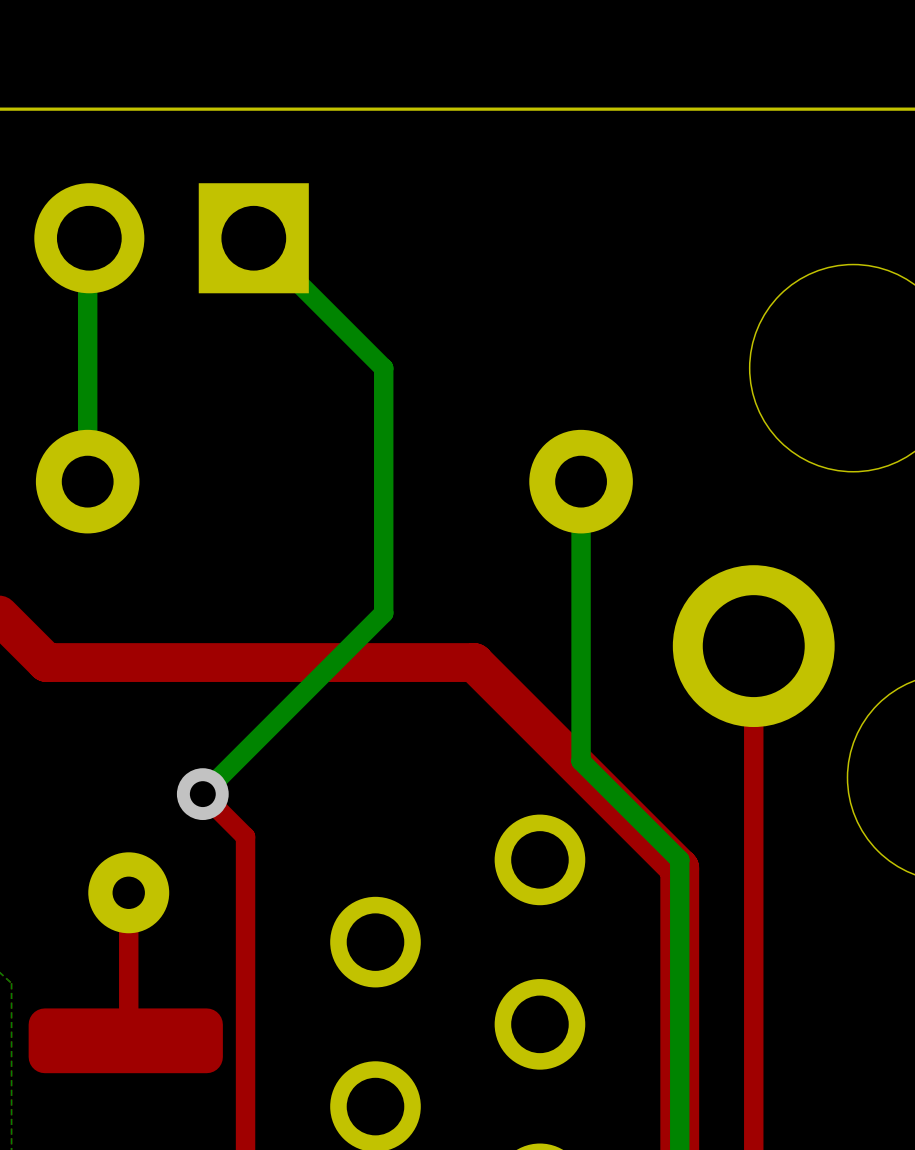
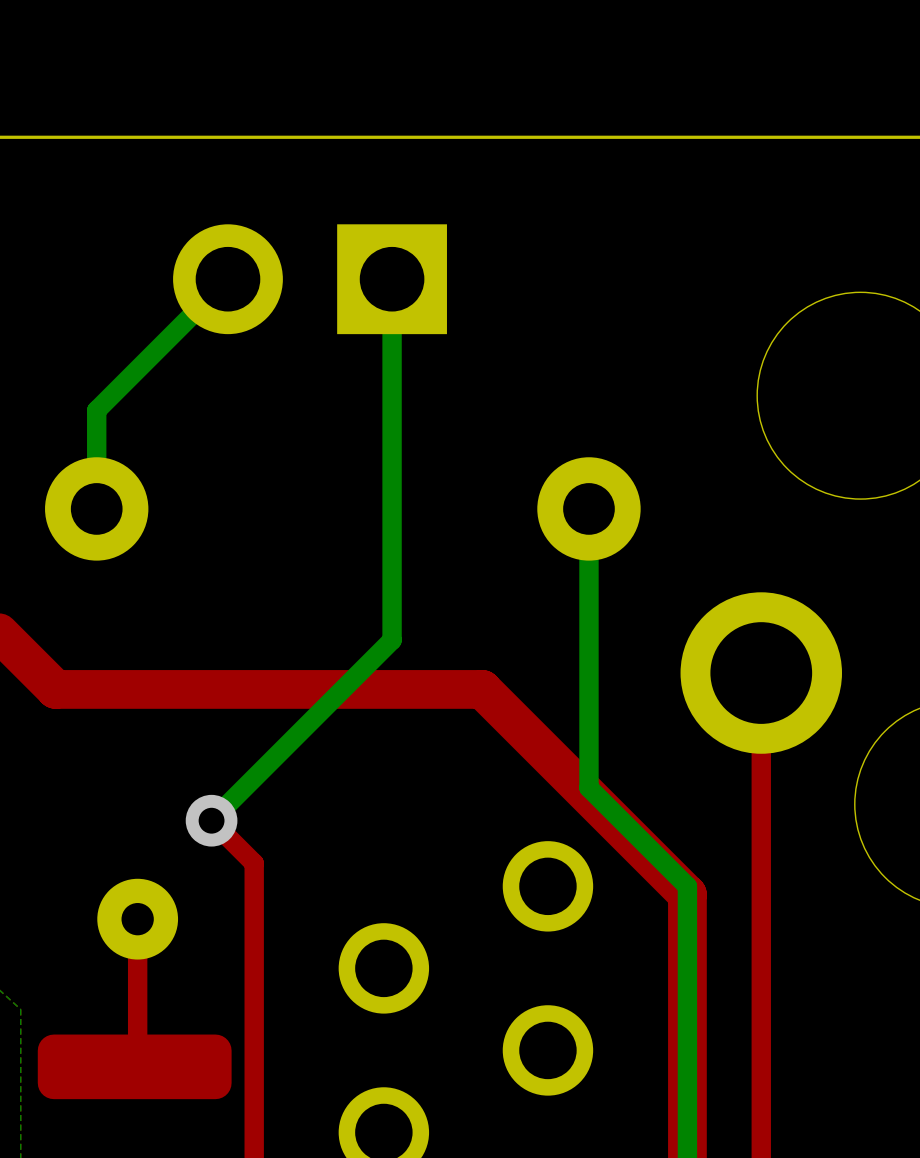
bottom track: (89, 238) (87, 239) (87, 382) -> (227, 279) (96, 410)
part position: (171, 238) -> (310, 279)
bottom track: (253, 238) (383, 368) -> (392, 279) (392, 395)

